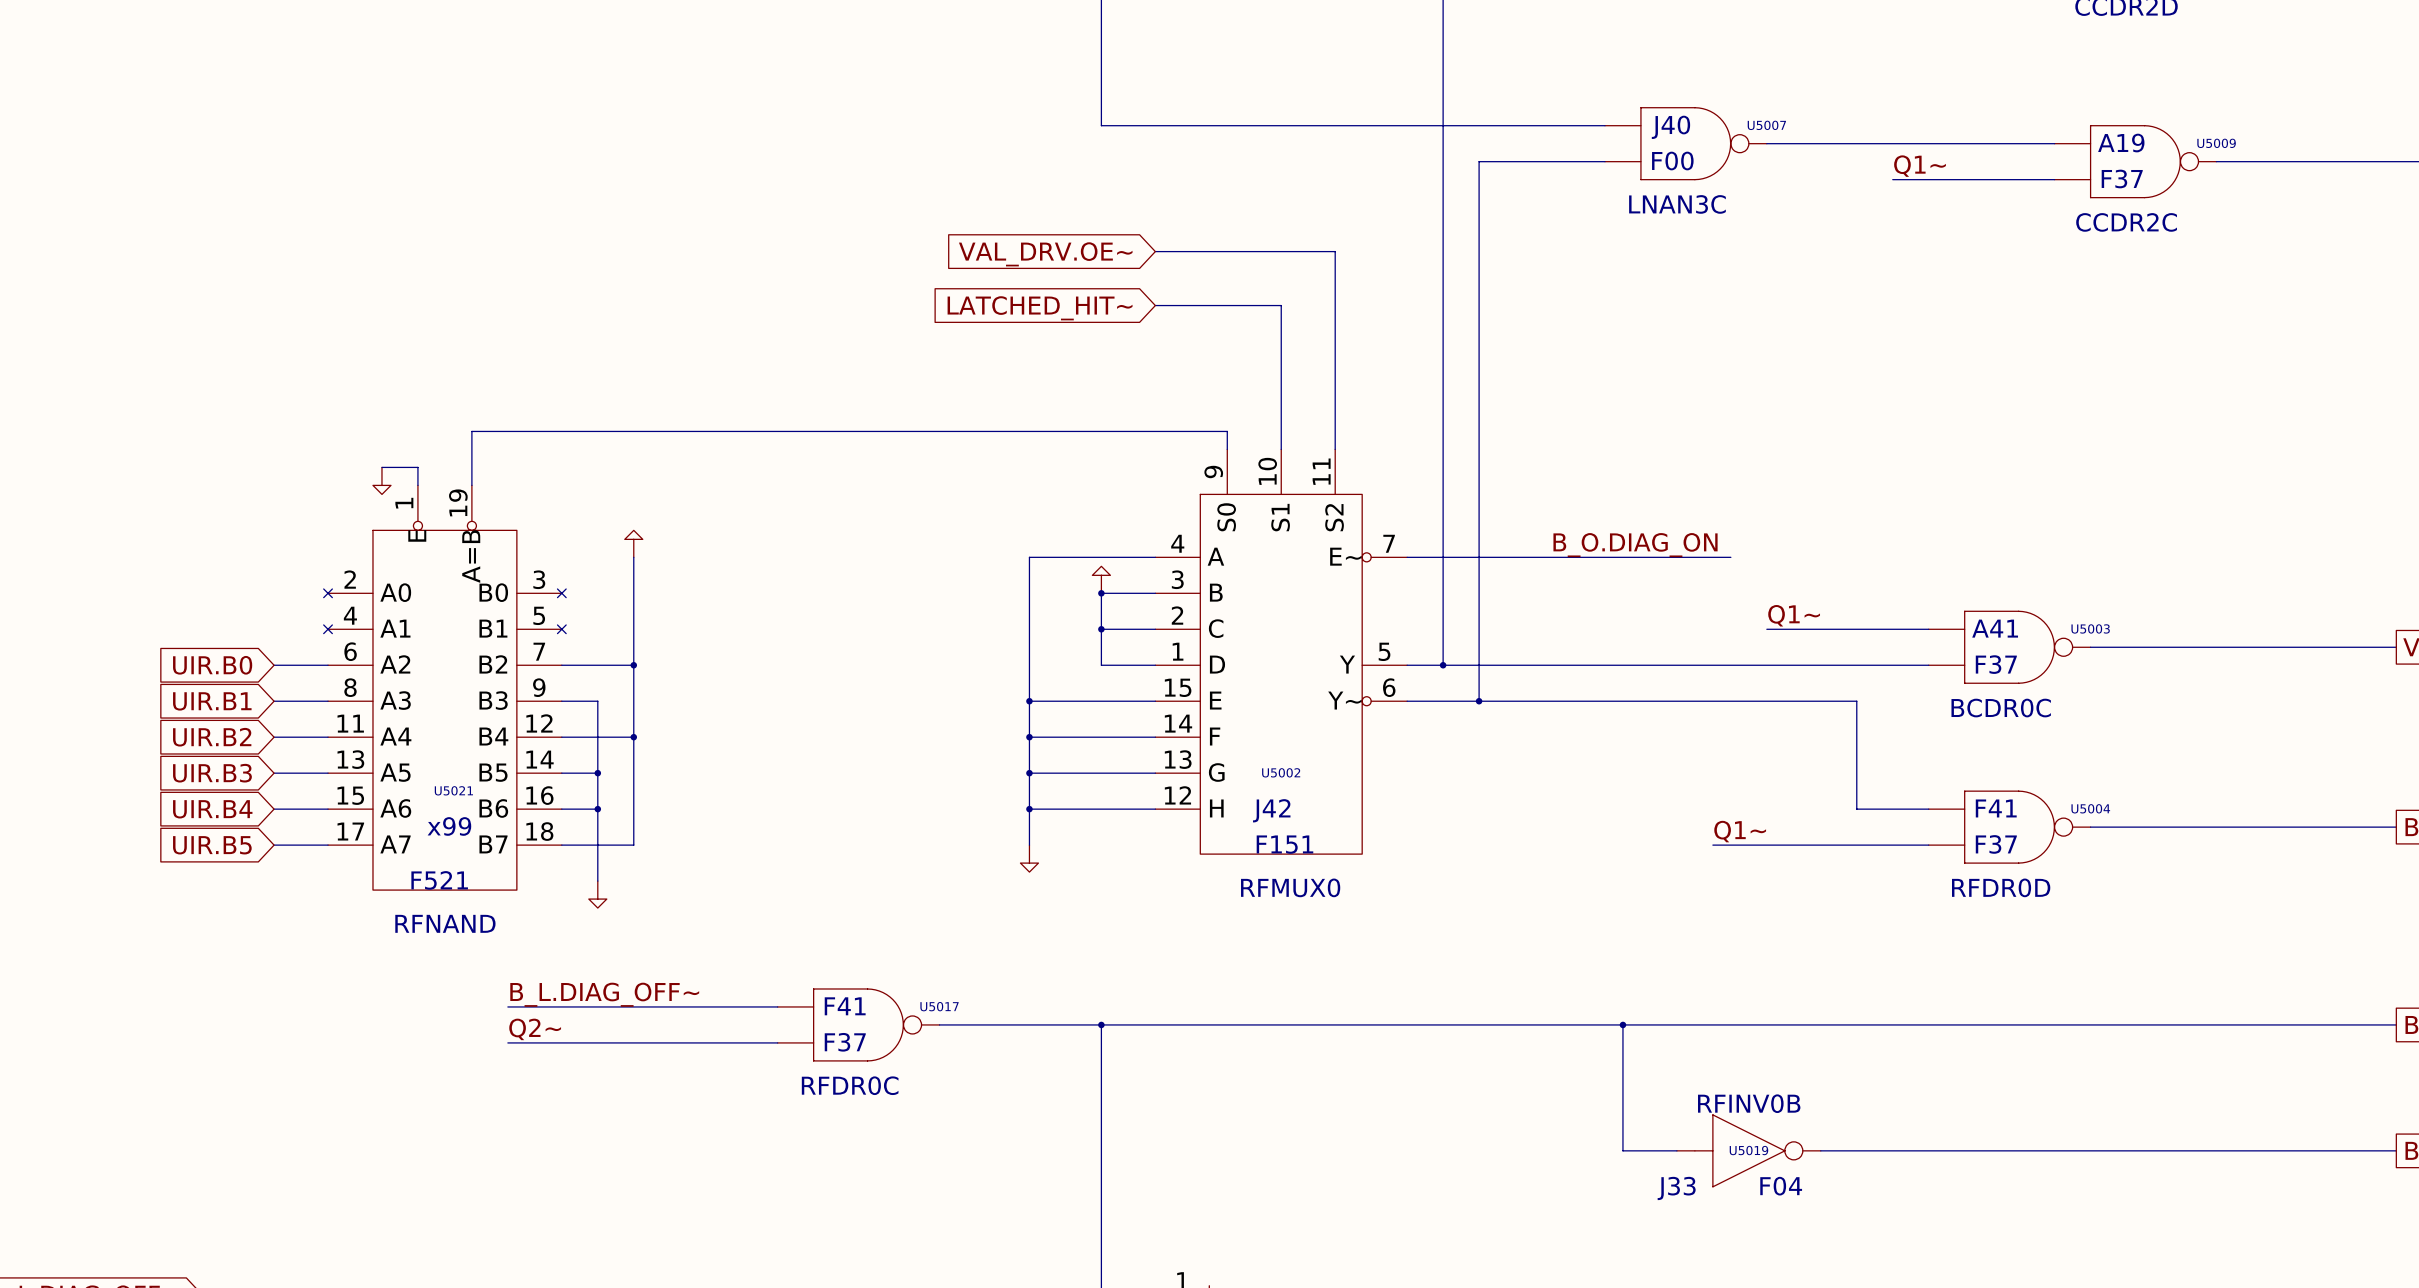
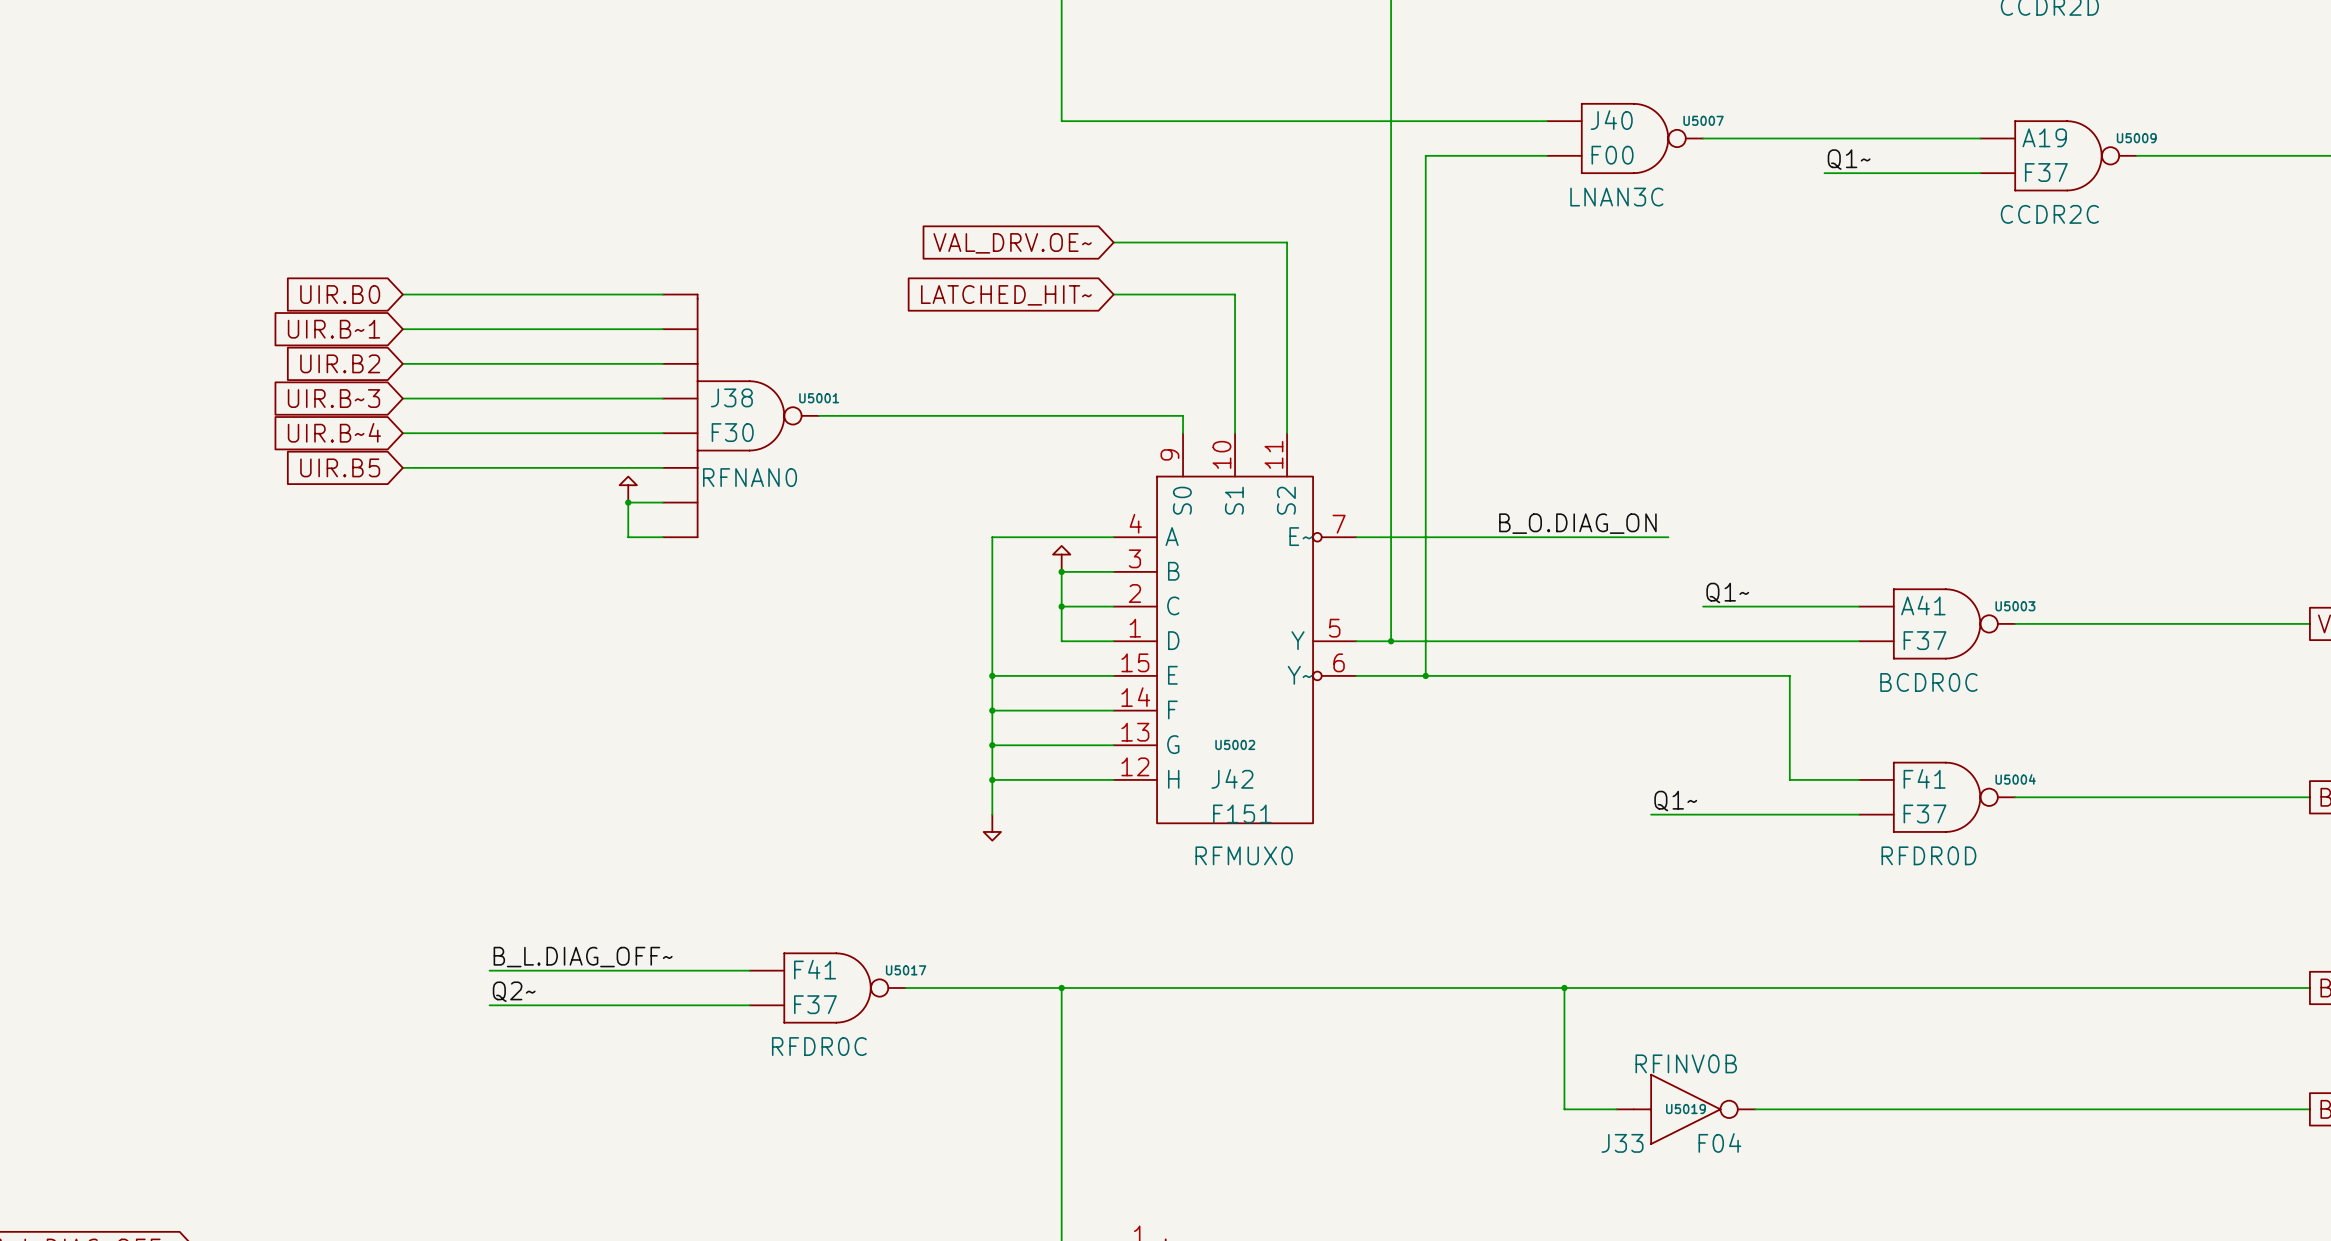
global label: none -> UIR.B0 (340, 294)
wire: none -> (402, 294) (662, 294)
global label: none -> UIR.B~1 (333, 329)
wire: none -> (402, 329) (662, 329)
global label: none -> UIR.B2 (340, 363)
wire: none -> (402, 363) (662, 363)
global label: none -> UIR.B~3 (333, 398)
wire: none -> (402, 398) (662, 398)
U5001: none -> F30 (740, 415)
wire: (849, 431) (471, 431) (471, 485) -> none
global label: none -> UIR.B~4 (334, 432)
wire: none -> (402, 433) (662, 433)
wire: (381, 467) (417, 467) (417, 485) -> (662, 467) (402, 467)
power symbol: (381, 481) -> none
global label: none -> UIR.B5 (340, 467)
junction: none -> (628, 502)
wire: none -> (662, 502) (628, 502) (628, 537) (662, 537)
power symbol position: (633, 543) -> (628, 489)
wire: (633, 557) (633, 845) (561, 845) -> none
no-connect mark: (328, 593) -> none
no-connect mark: (561, 593) -> none
no-connect mark: (328, 629) -> none
no-connect mark: (561, 629) -> none
global label: UIR.B0 (212, 665) -> none
wire: (274, 665) (328, 665) -> none
wire: (561, 665) (633, 665) -> none
junction: (633, 665) -> none
U5021: F521 (444, 687) -> none
global label: UIR.B1 (212, 701) -> none
wire: (274, 701) (328, 701) -> none
wire: (561, 701) (597, 701) (597, 881) -> none
global label: UIR.B2 (212, 737) -> none
wire: (274, 737) (328, 737) -> none
wire: (561, 737) (633, 737) -> none
junction: (633, 737) -> none
global label: UIR.B3 (212, 773) -> none
wire: (274, 773) (328, 773) -> none
wire: (561, 773) (597, 773) -> none
junction: (597, 773) -> none
global label: UIR.B4 (212, 809) -> none
wire: (274, 809) (328, 809) -> none
wire: (561, 809) (597, 809) -> none
junction: (597, 809) -> none
global label: UIR.B5 (212, 845) -> none
wire: (274, 845) (328, 845) -> none
power symbol: (597, 894) -> none

